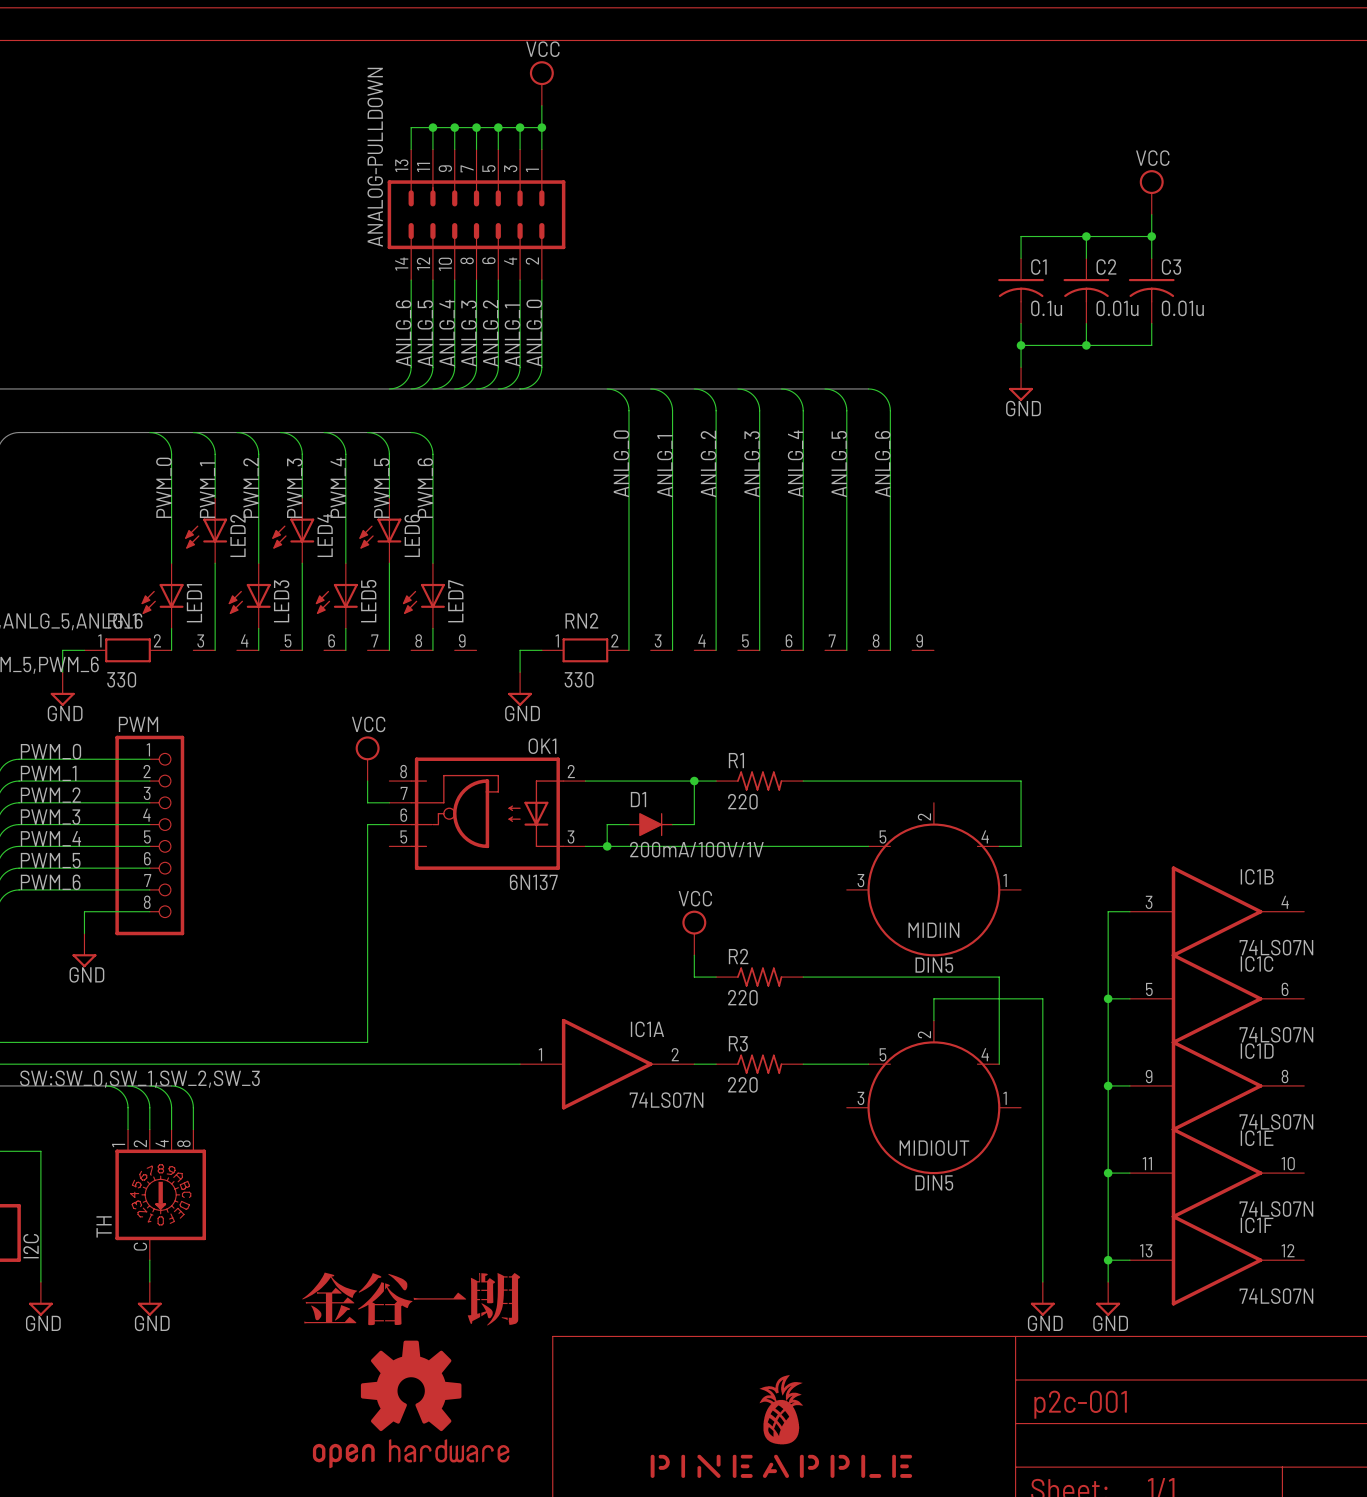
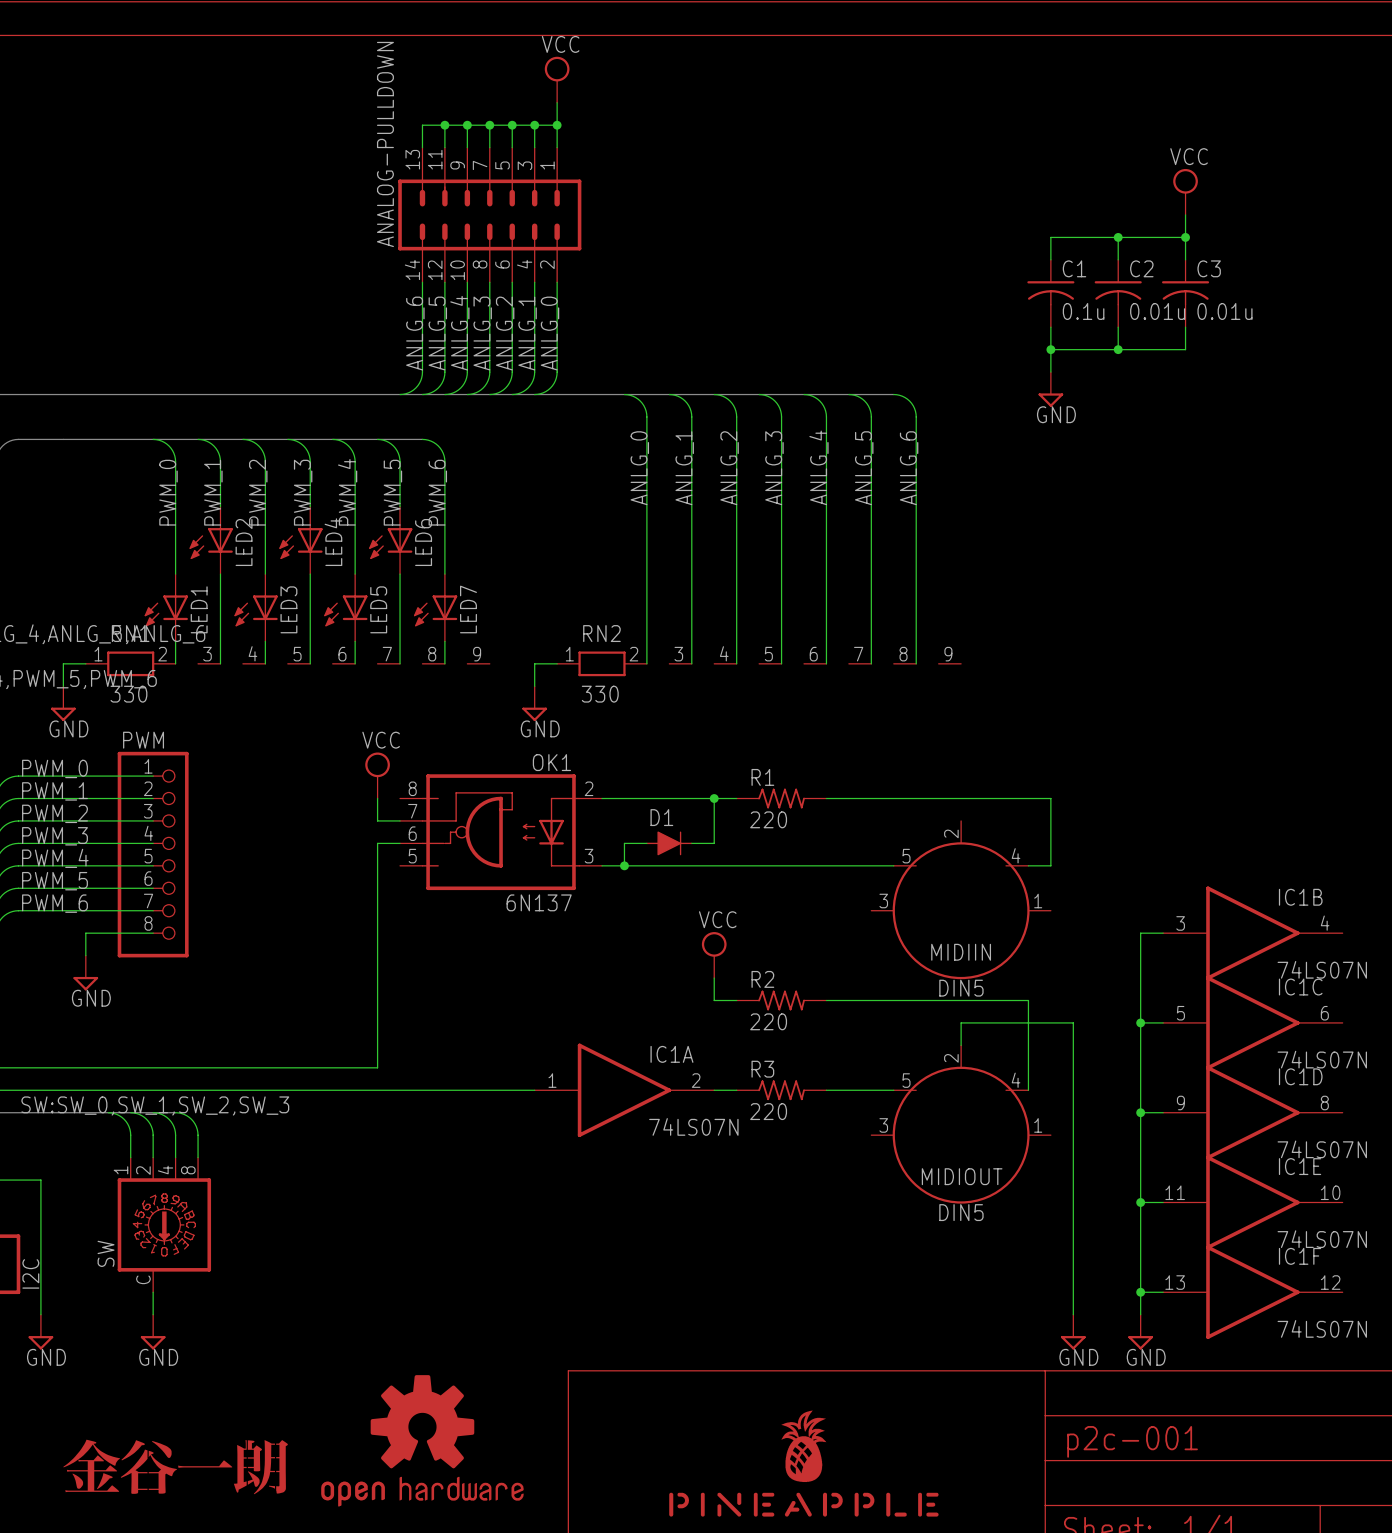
D1 value: 200mA/100V/1V (696, 849) -> none
TH name: TH (104, 1226) -> SW (106, 1253)
part: (411, 1299) -> none
part: none -> (175, 1466)

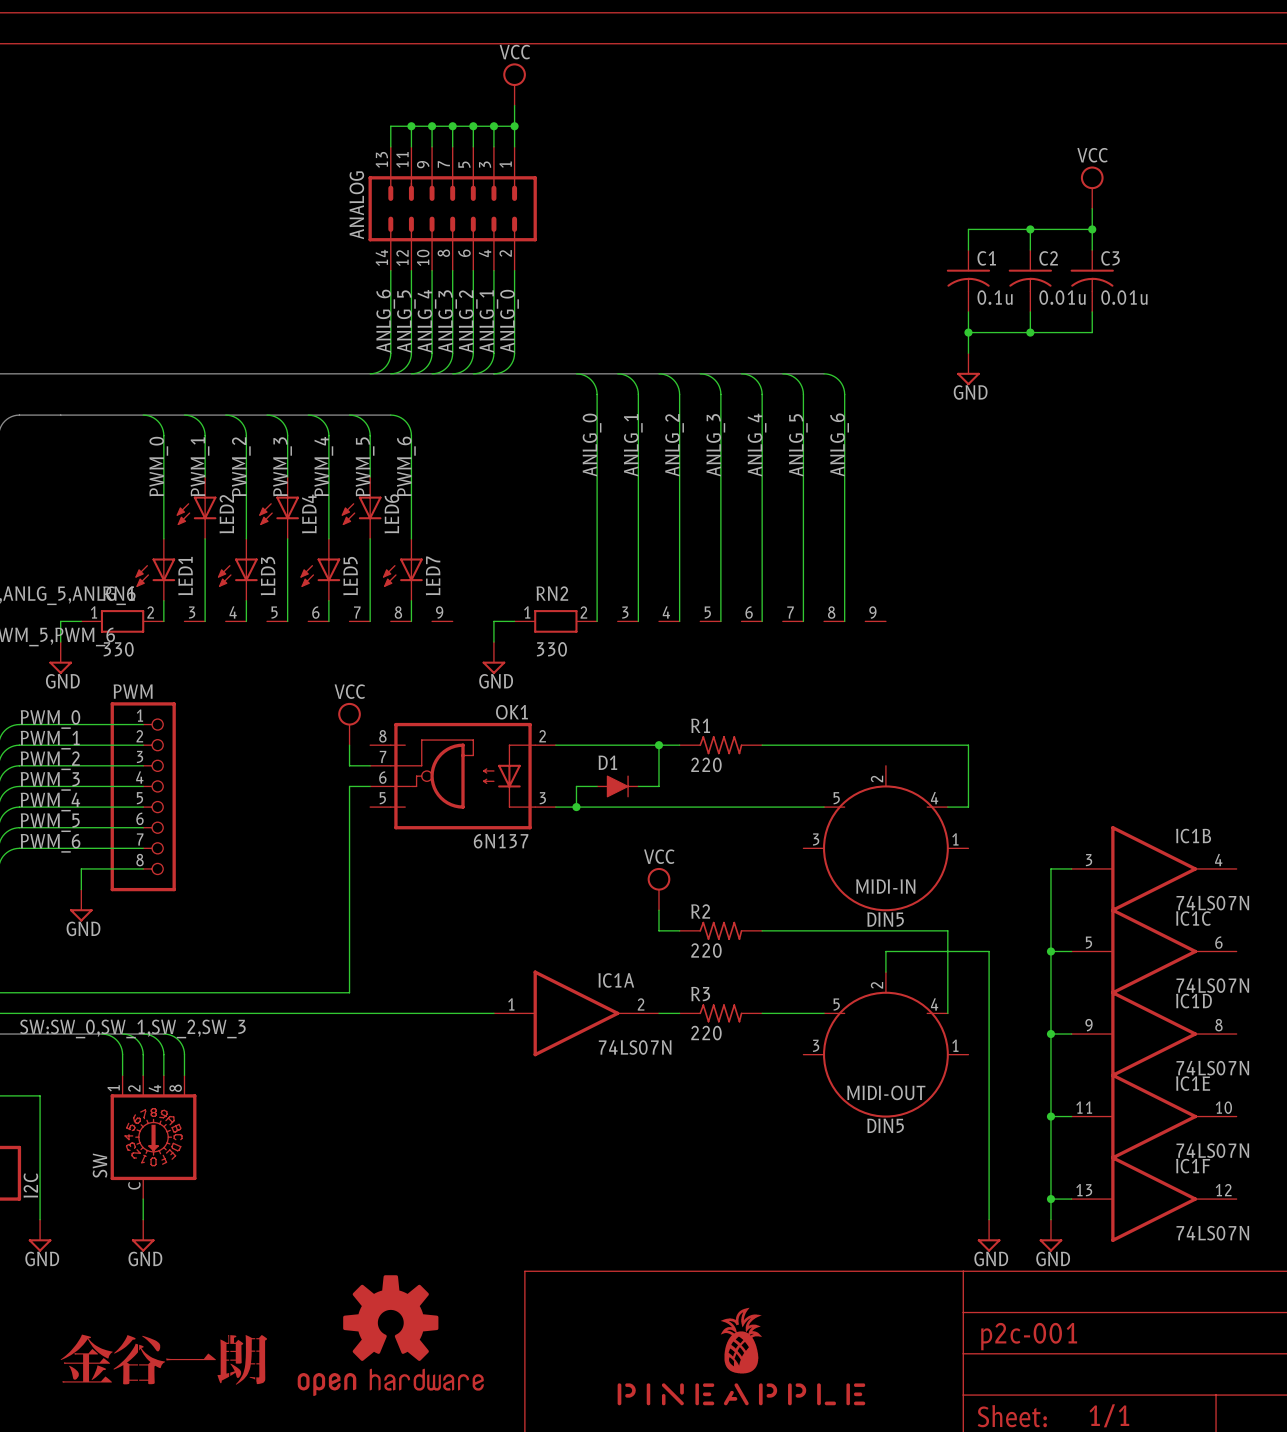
ANALOG-PULLDOWN name: ANALOG-PULLDOWN (385, 144) -> ANALOG (356, 205)
MIDIIN name: MIDIIN (961, 952) -> MIDI-IN (885, 886)
MIDIOUT name: MIDIOUT (962, 1176) -> MIDI-OUT (886, 1092)

